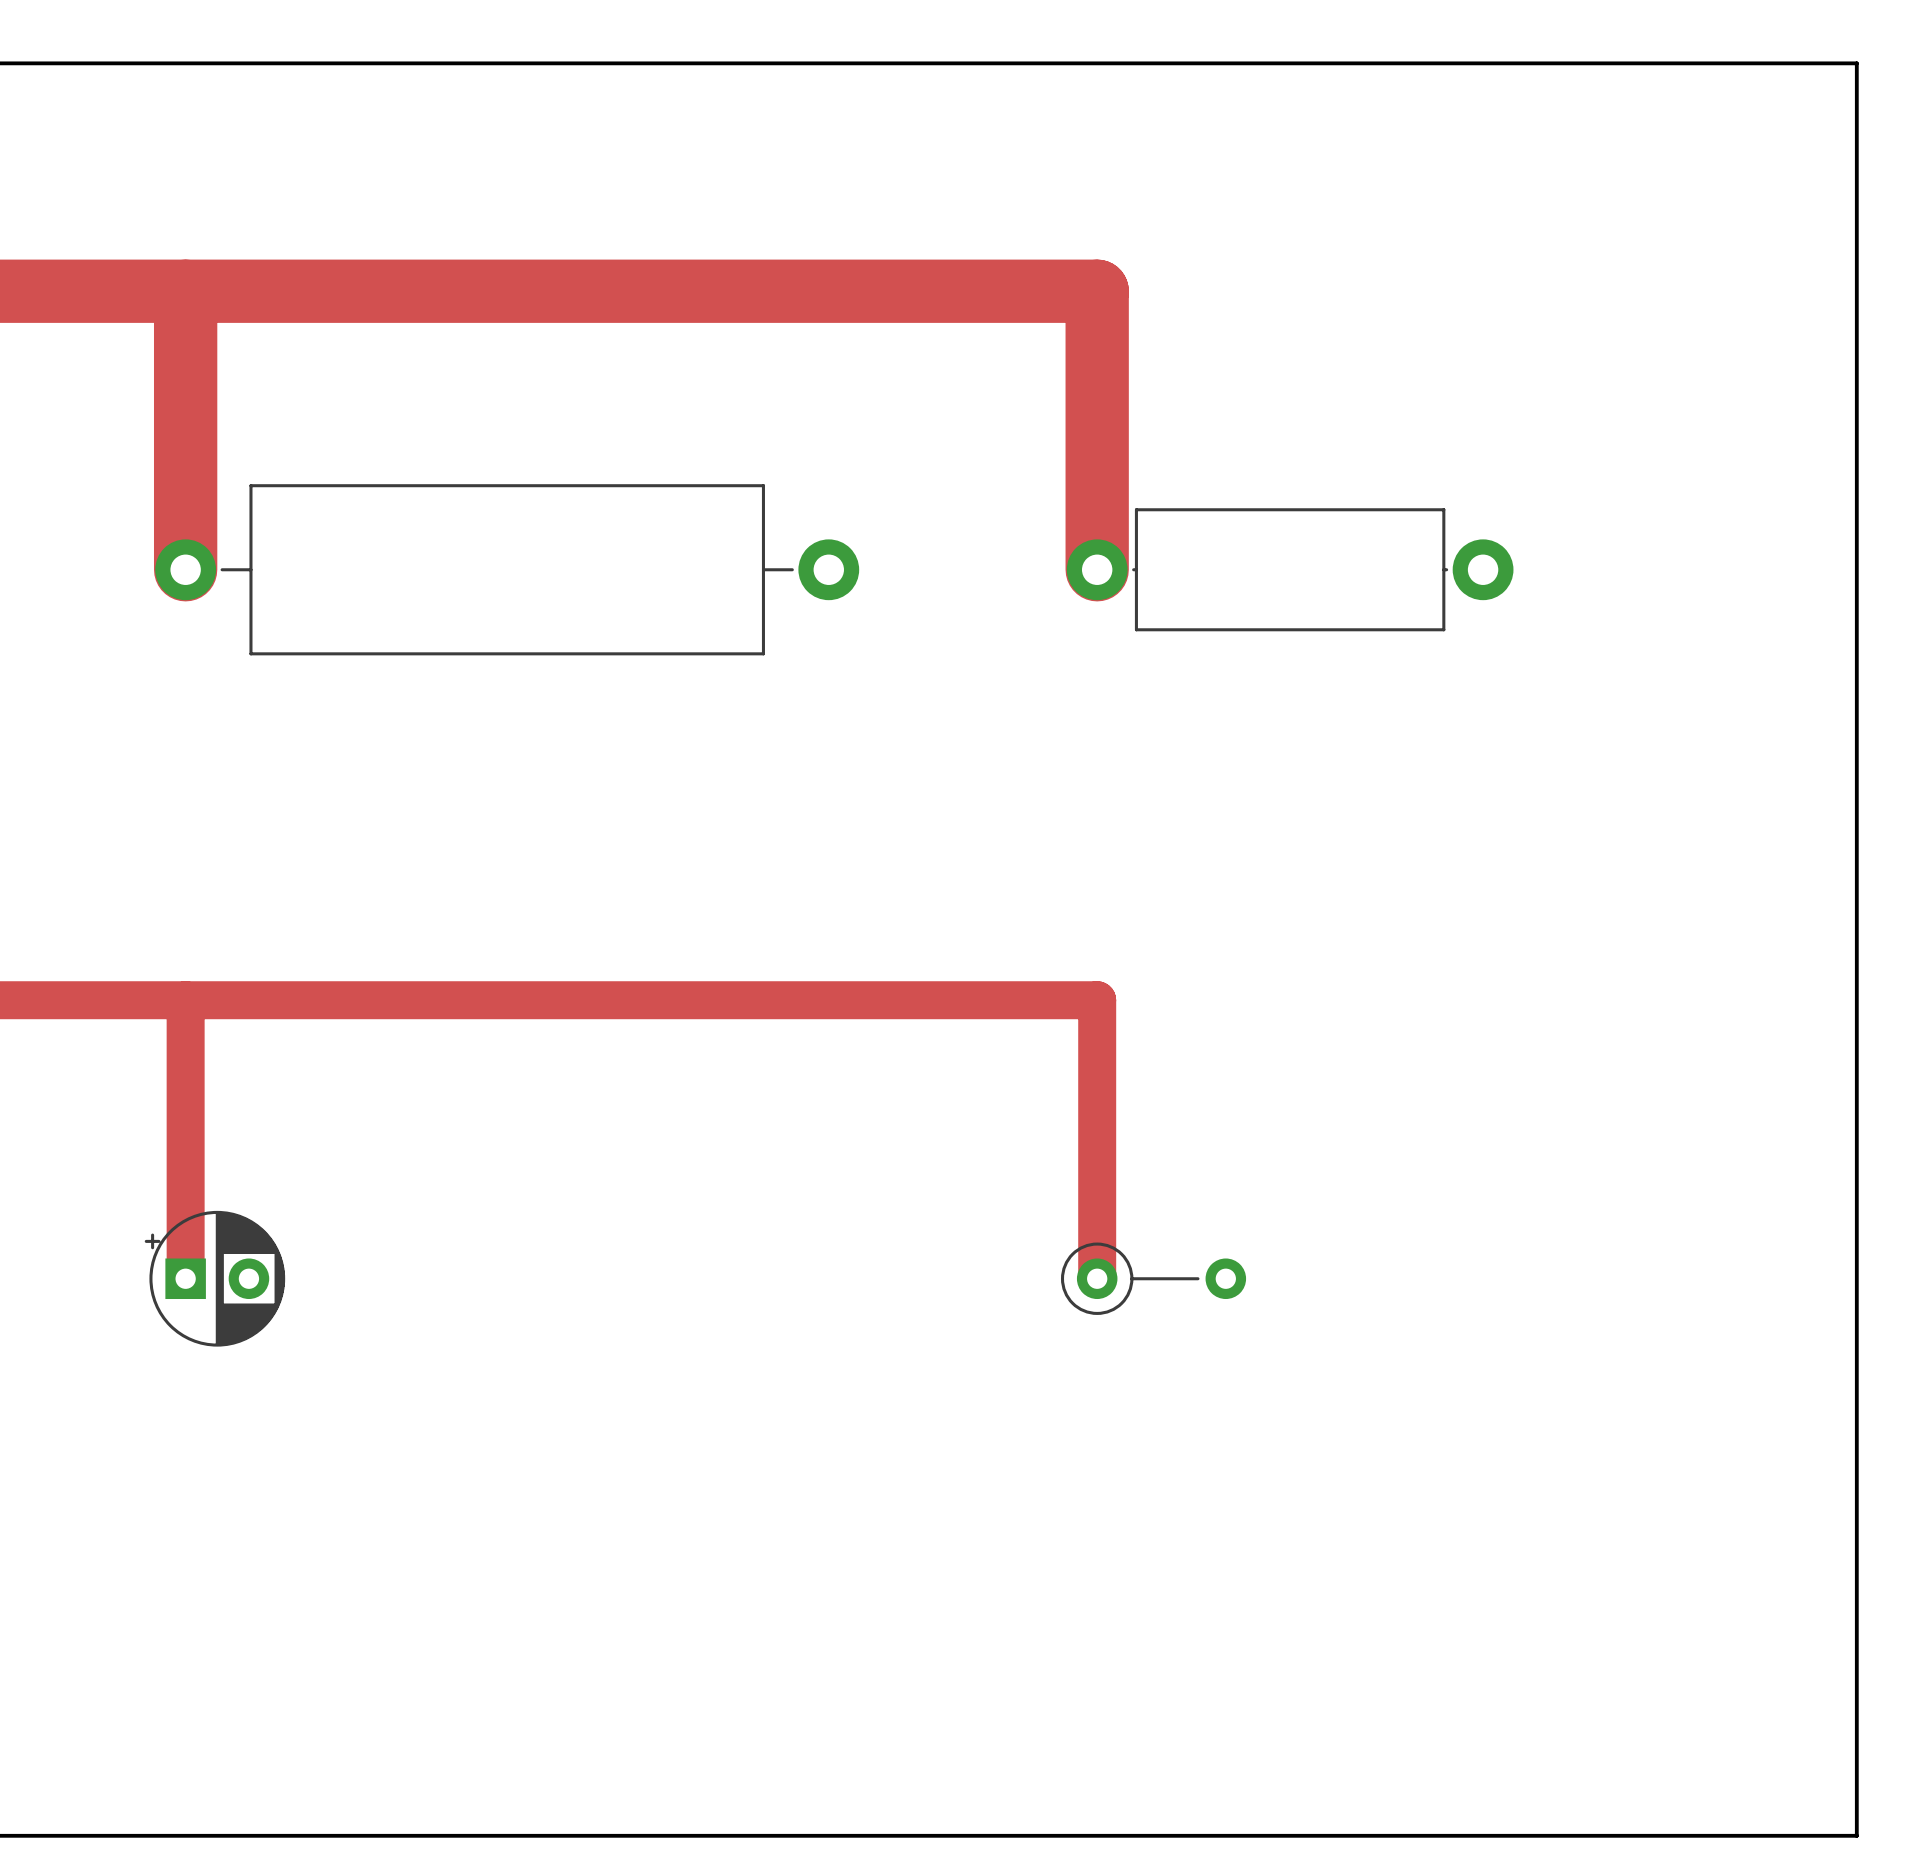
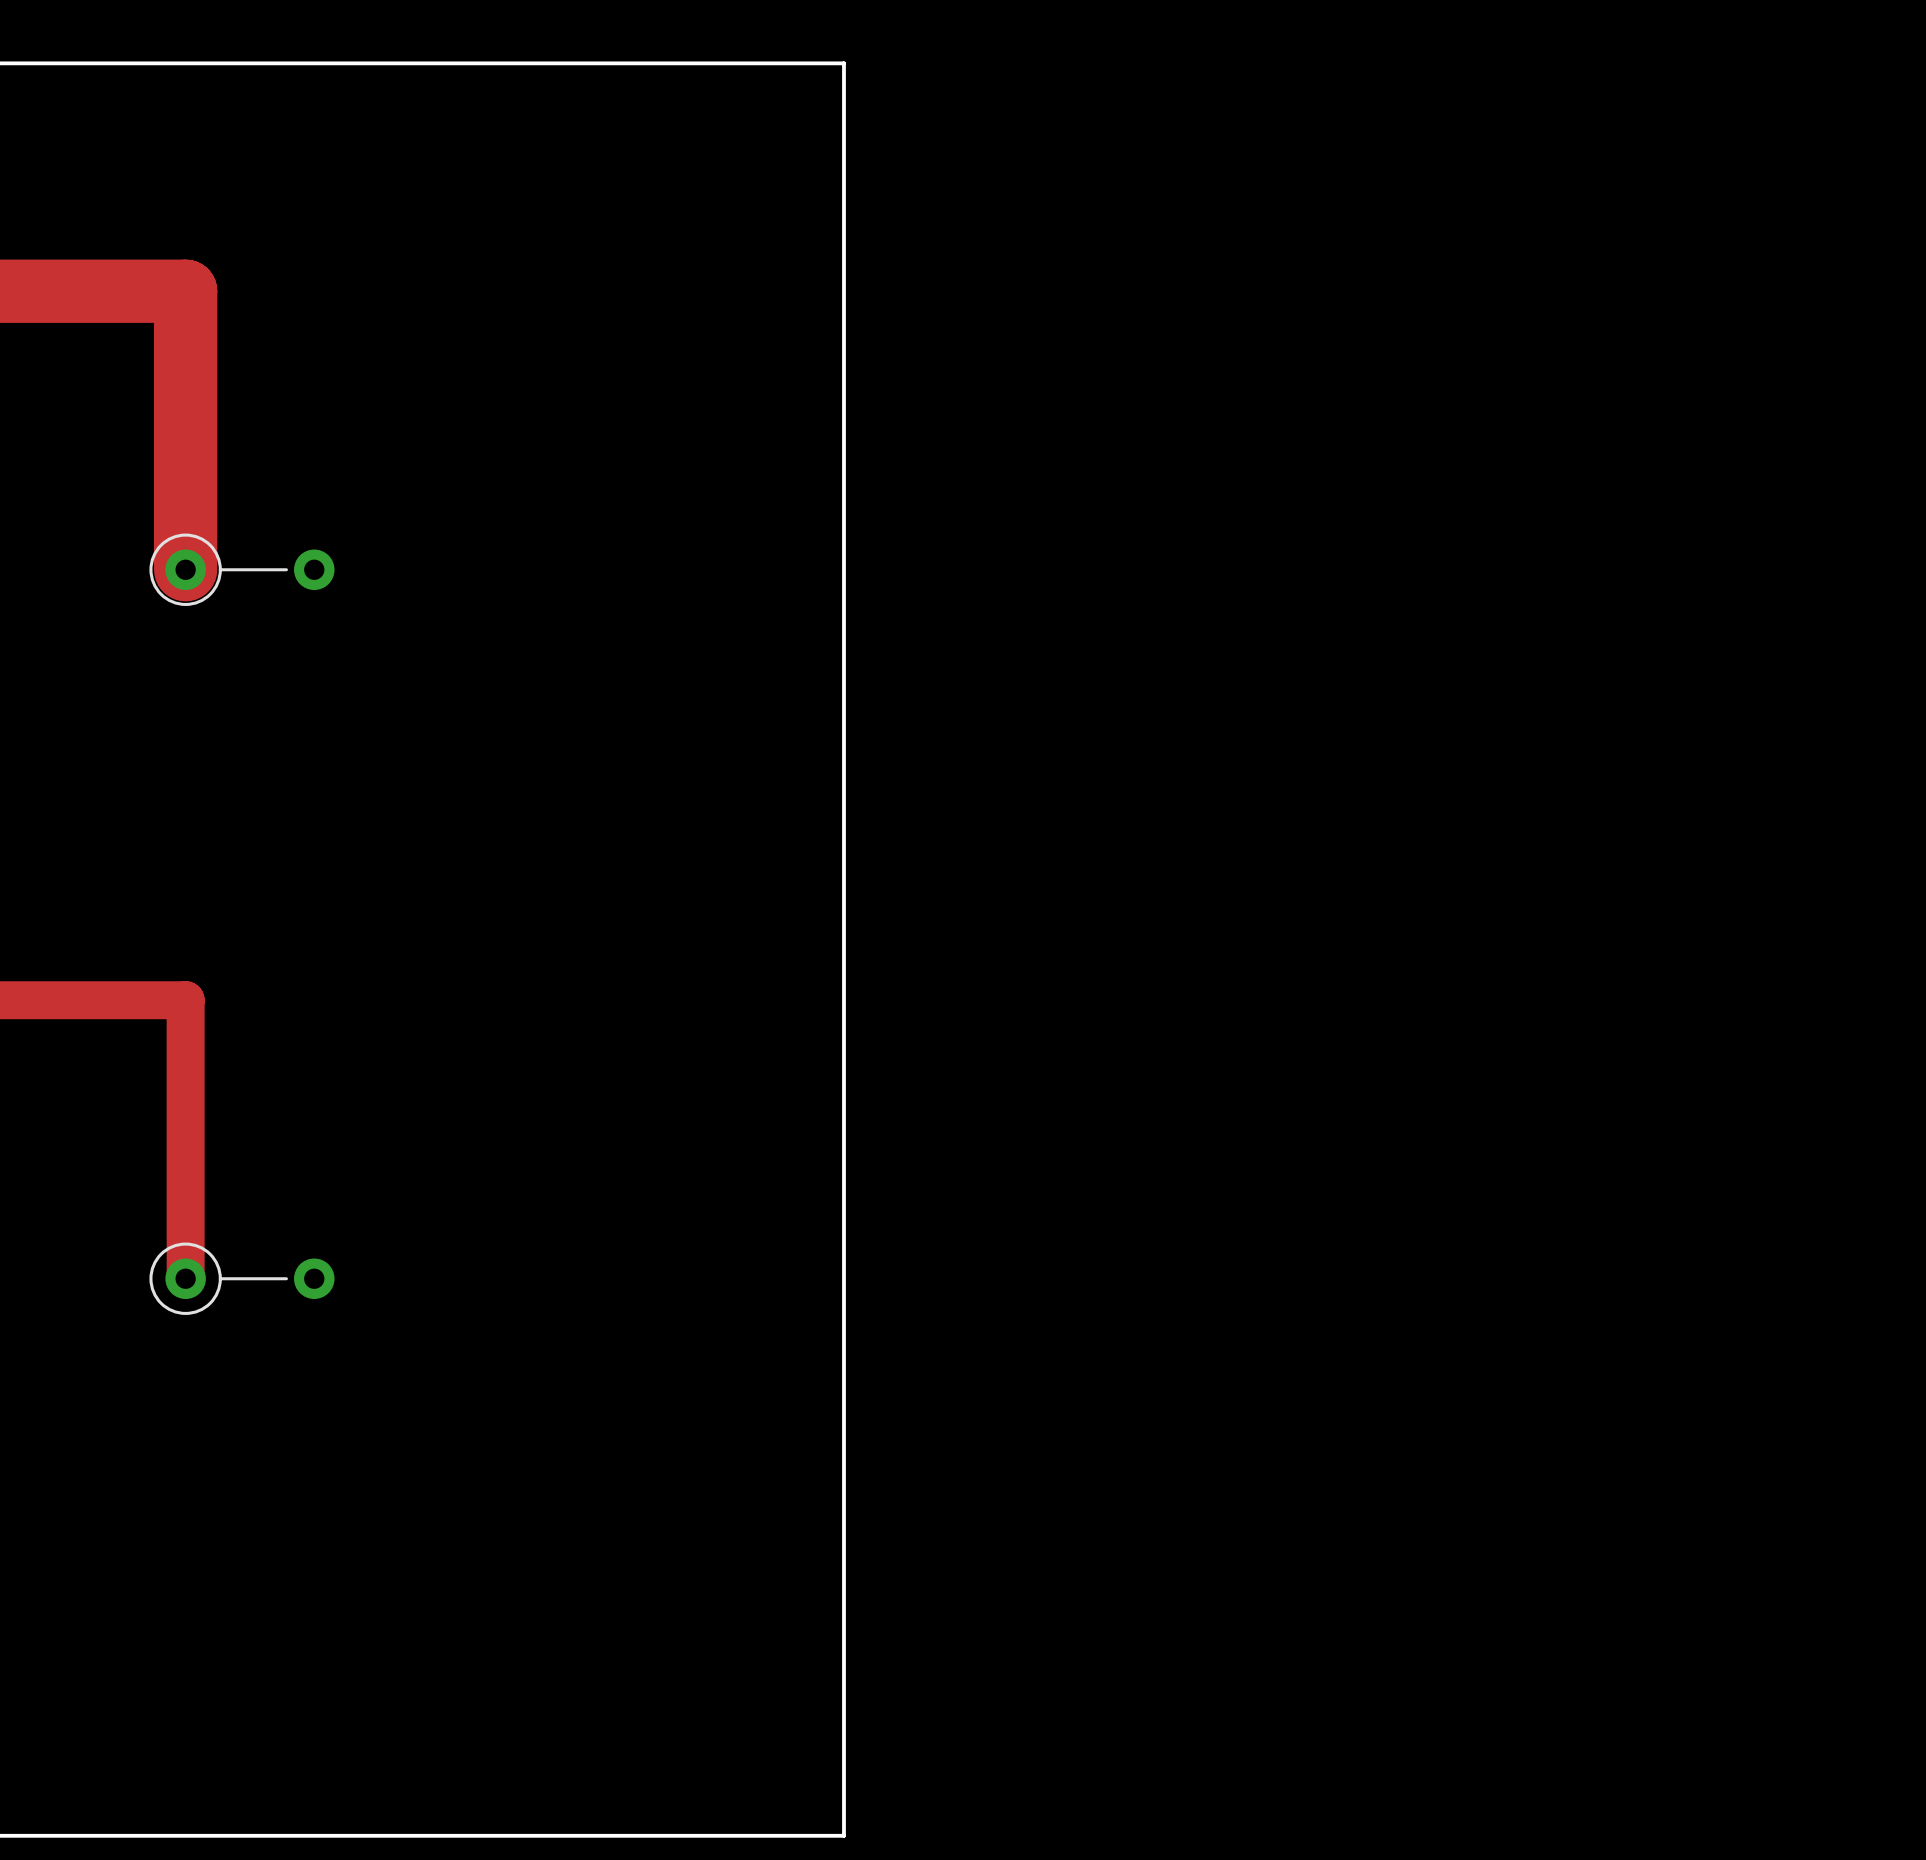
board edge: (843, 63) (1856, 63) (1856, 1835) (843, 1835) -> (843, 63) (843, 1835)
track: (185, 291) (1097, 291) (1097, 569) -> none
part: none -> (241, 569)
part: (507, 569) -> none
part: (1290, 569) -> none
track: (185, 1000) (1097, 1000) (1097, 1278) -> none
part: (214, 1278) -> none
part: none -> (241, 1278)
part: (1153, 1278) -> none

